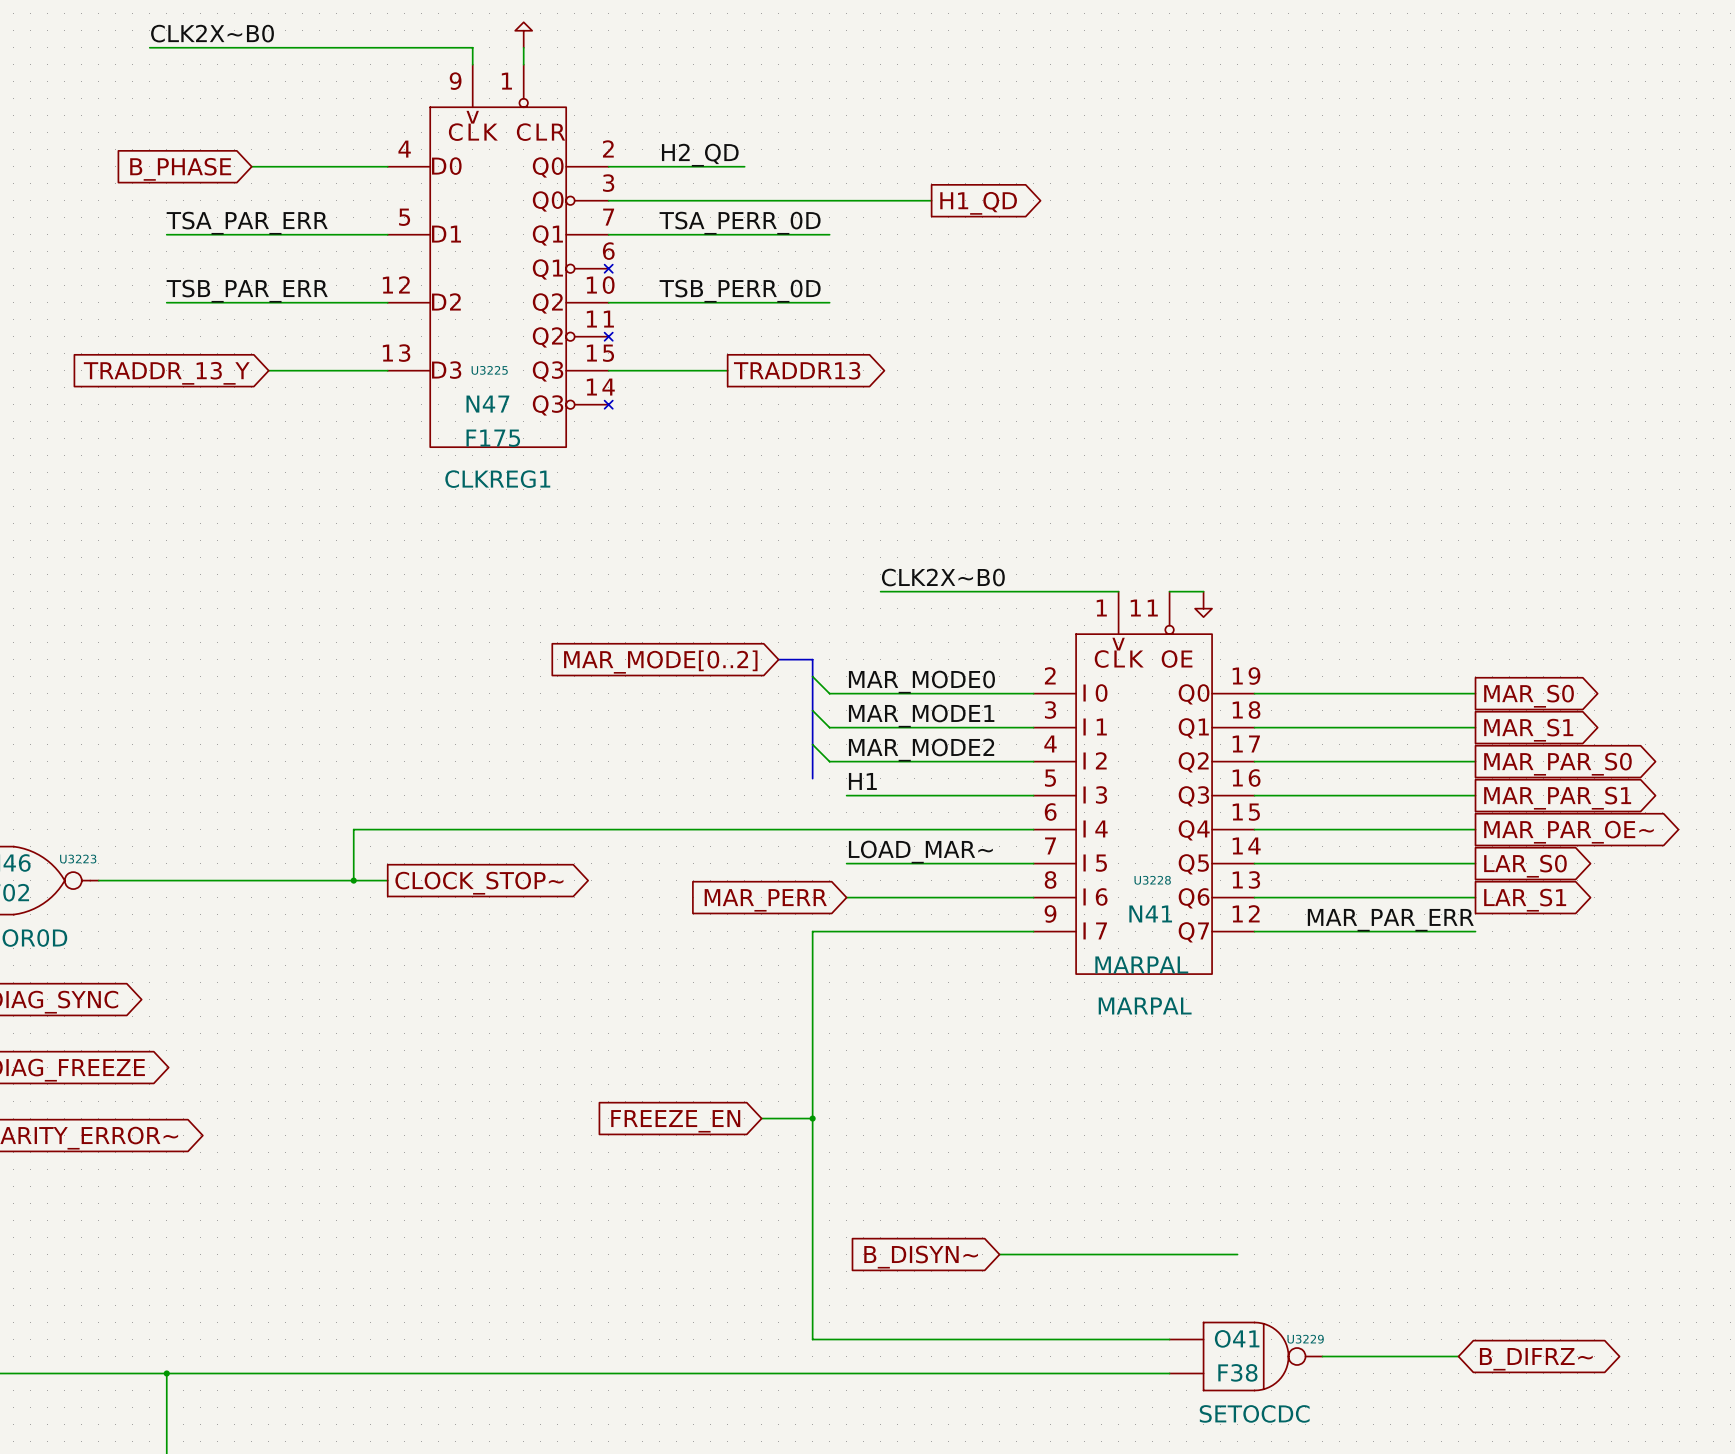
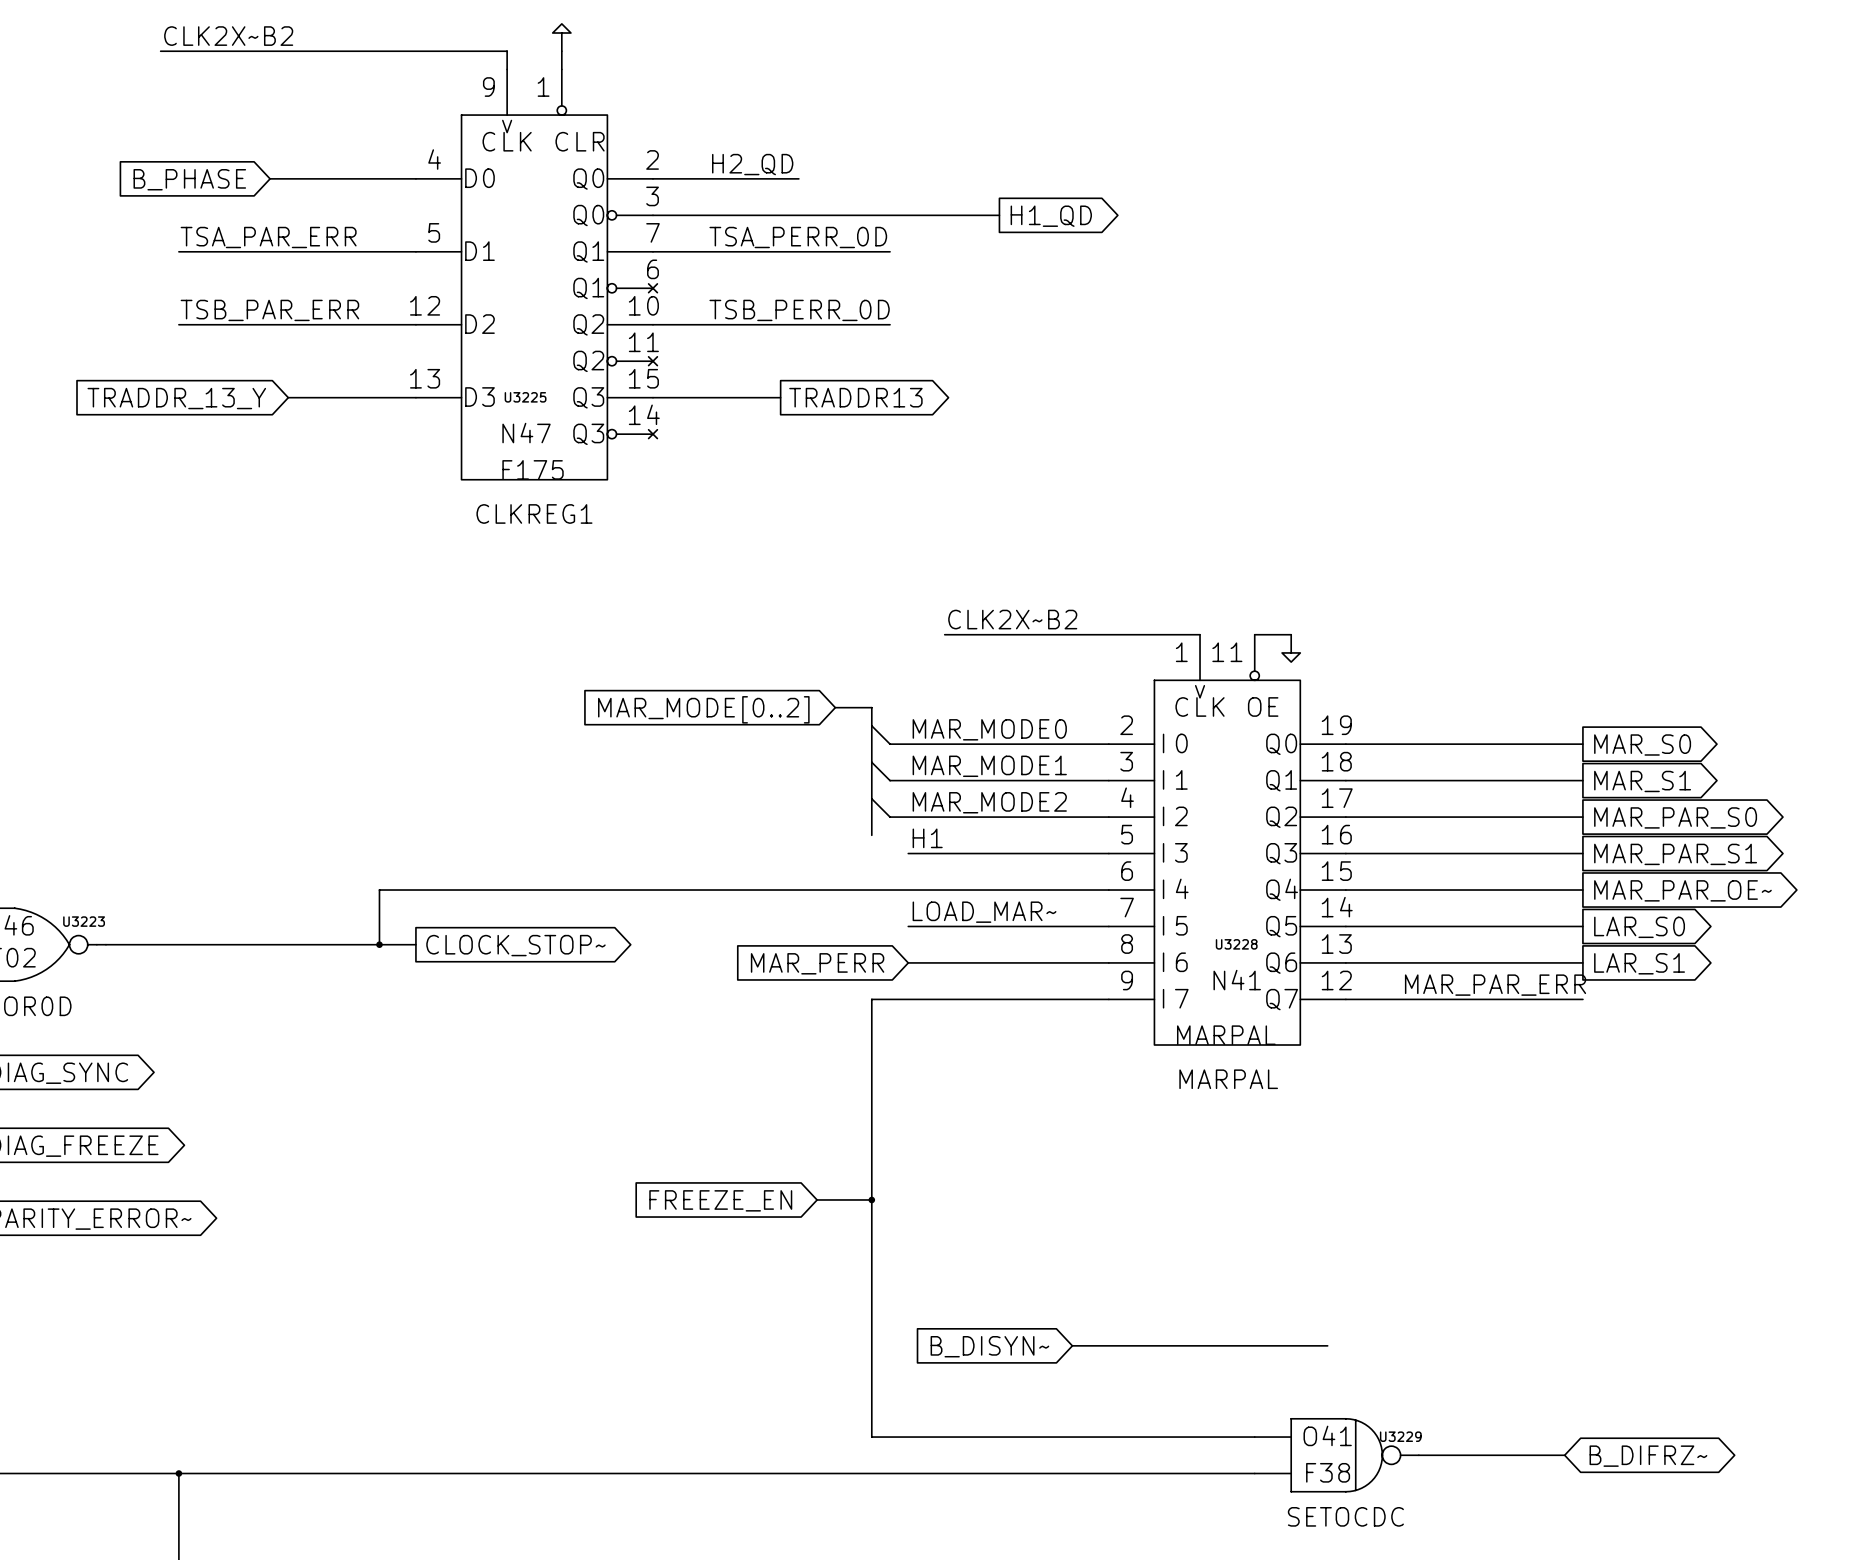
label: CLK2X~B0 (212, 33) -> CLK2X~B2 (228, 36)
label: CLK2X~B0 (943, 577) -> CLK2X~B2 (1012, 619)

